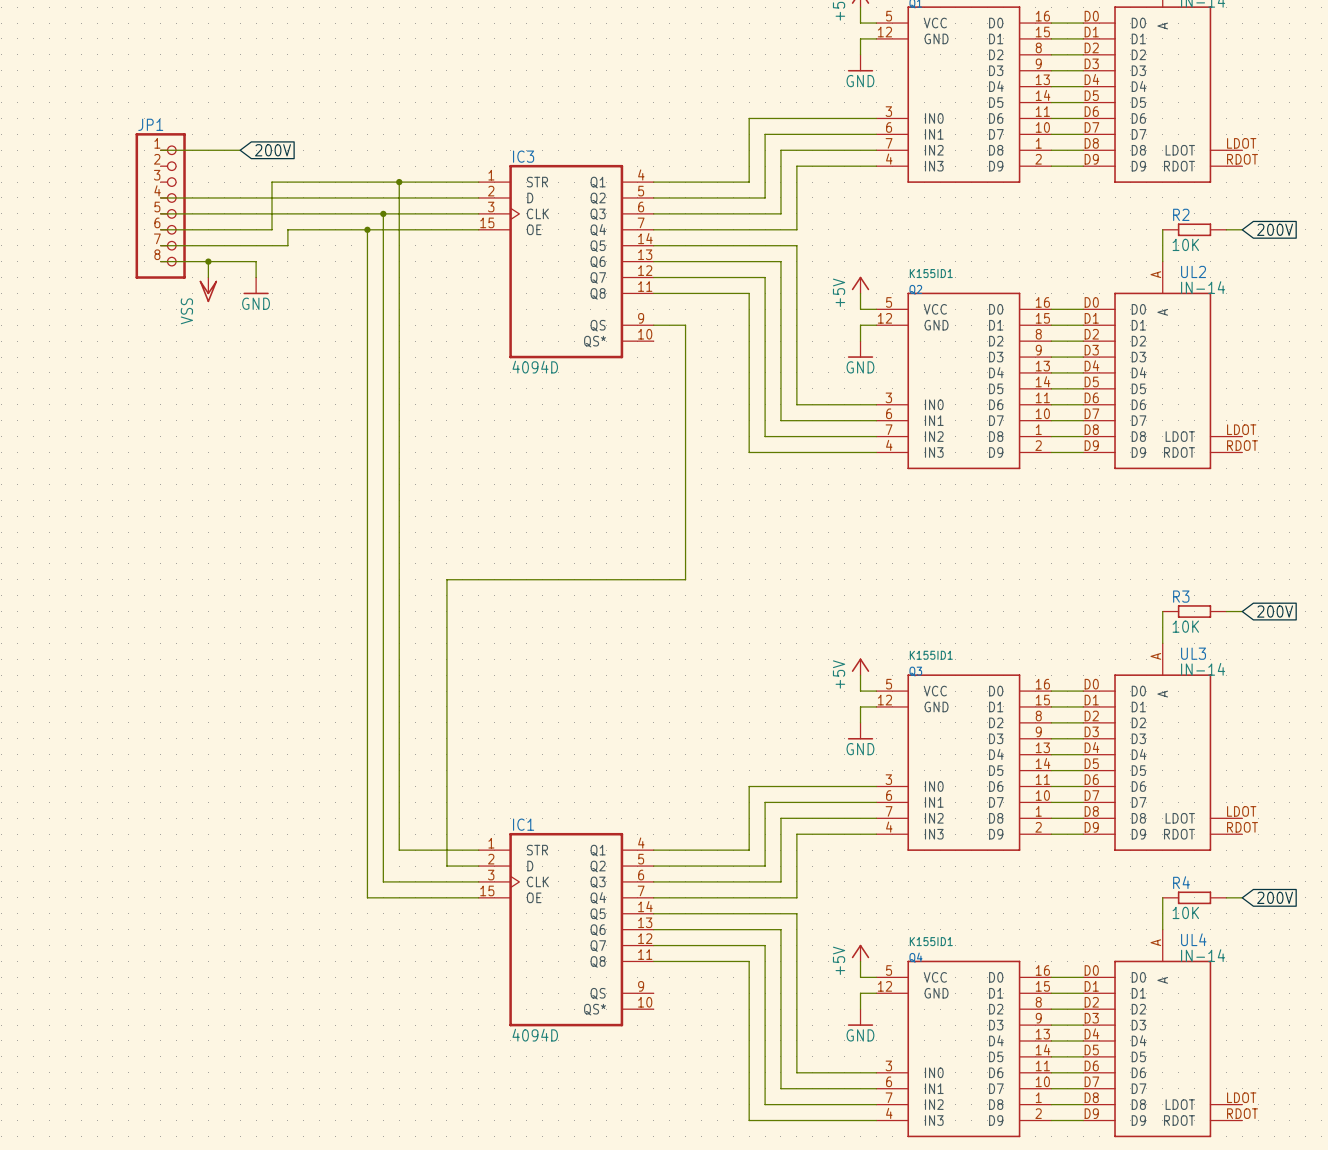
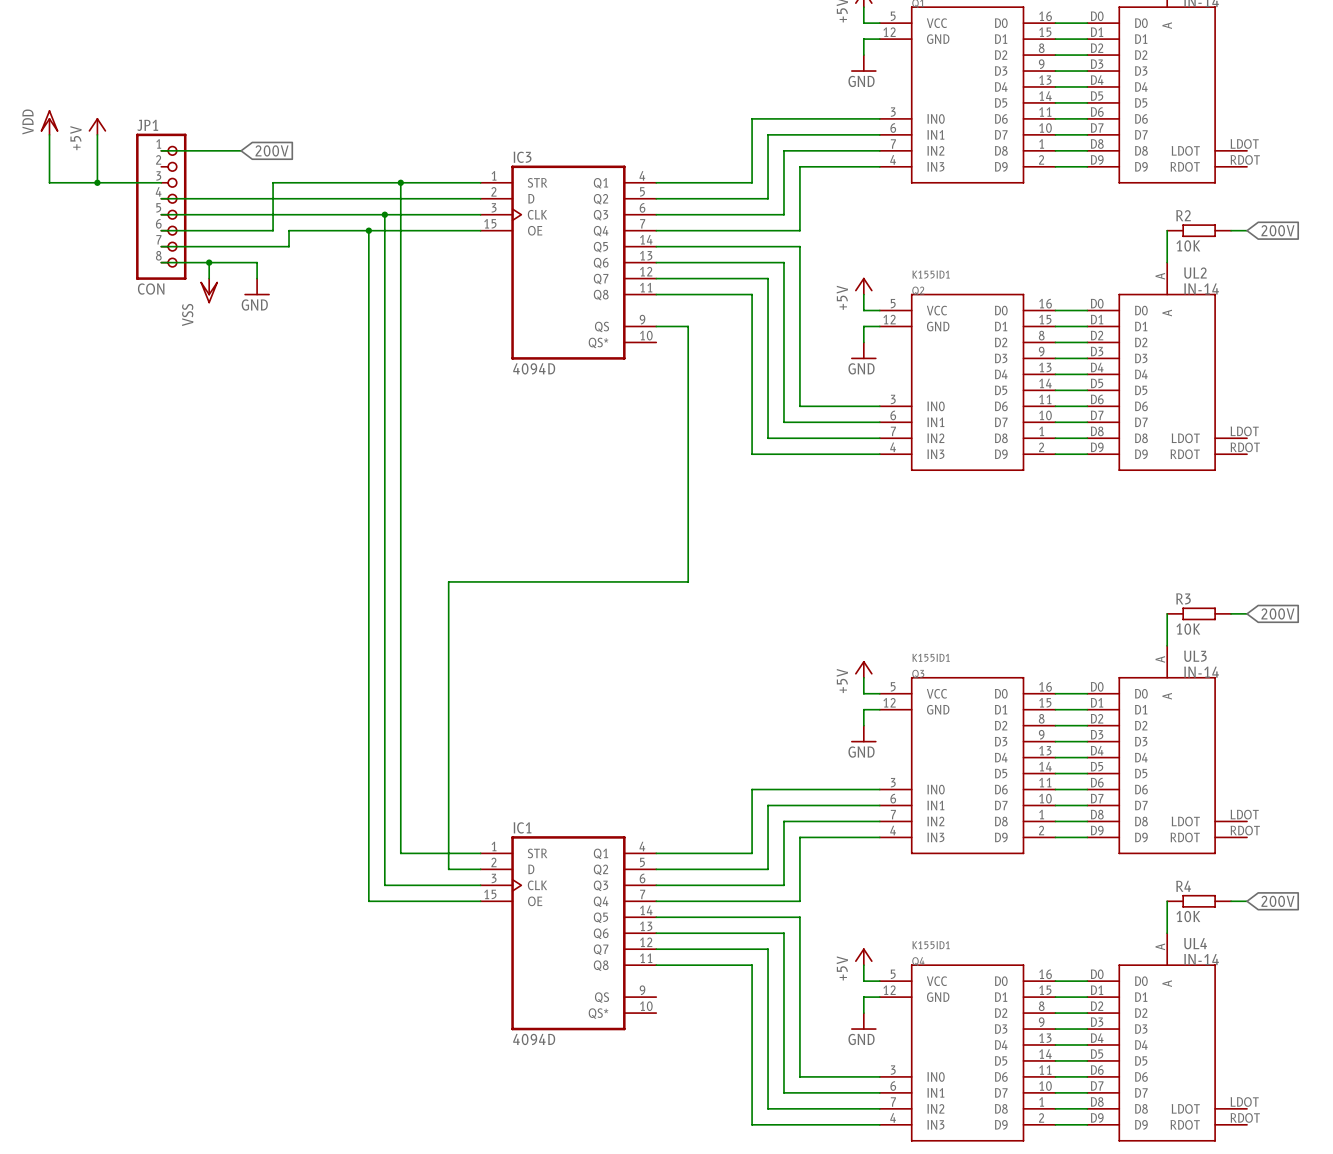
power symbol: none -> VDD (49, 122)
power symbol: none -> +5V (97, 126)
wire: none -> (49, 134) (49, 182) (161, 182)
wire: none -> (97, 134) (97, 182)
junction: none -> (97, 182)
JP1 value: none -> CON (151, 289)

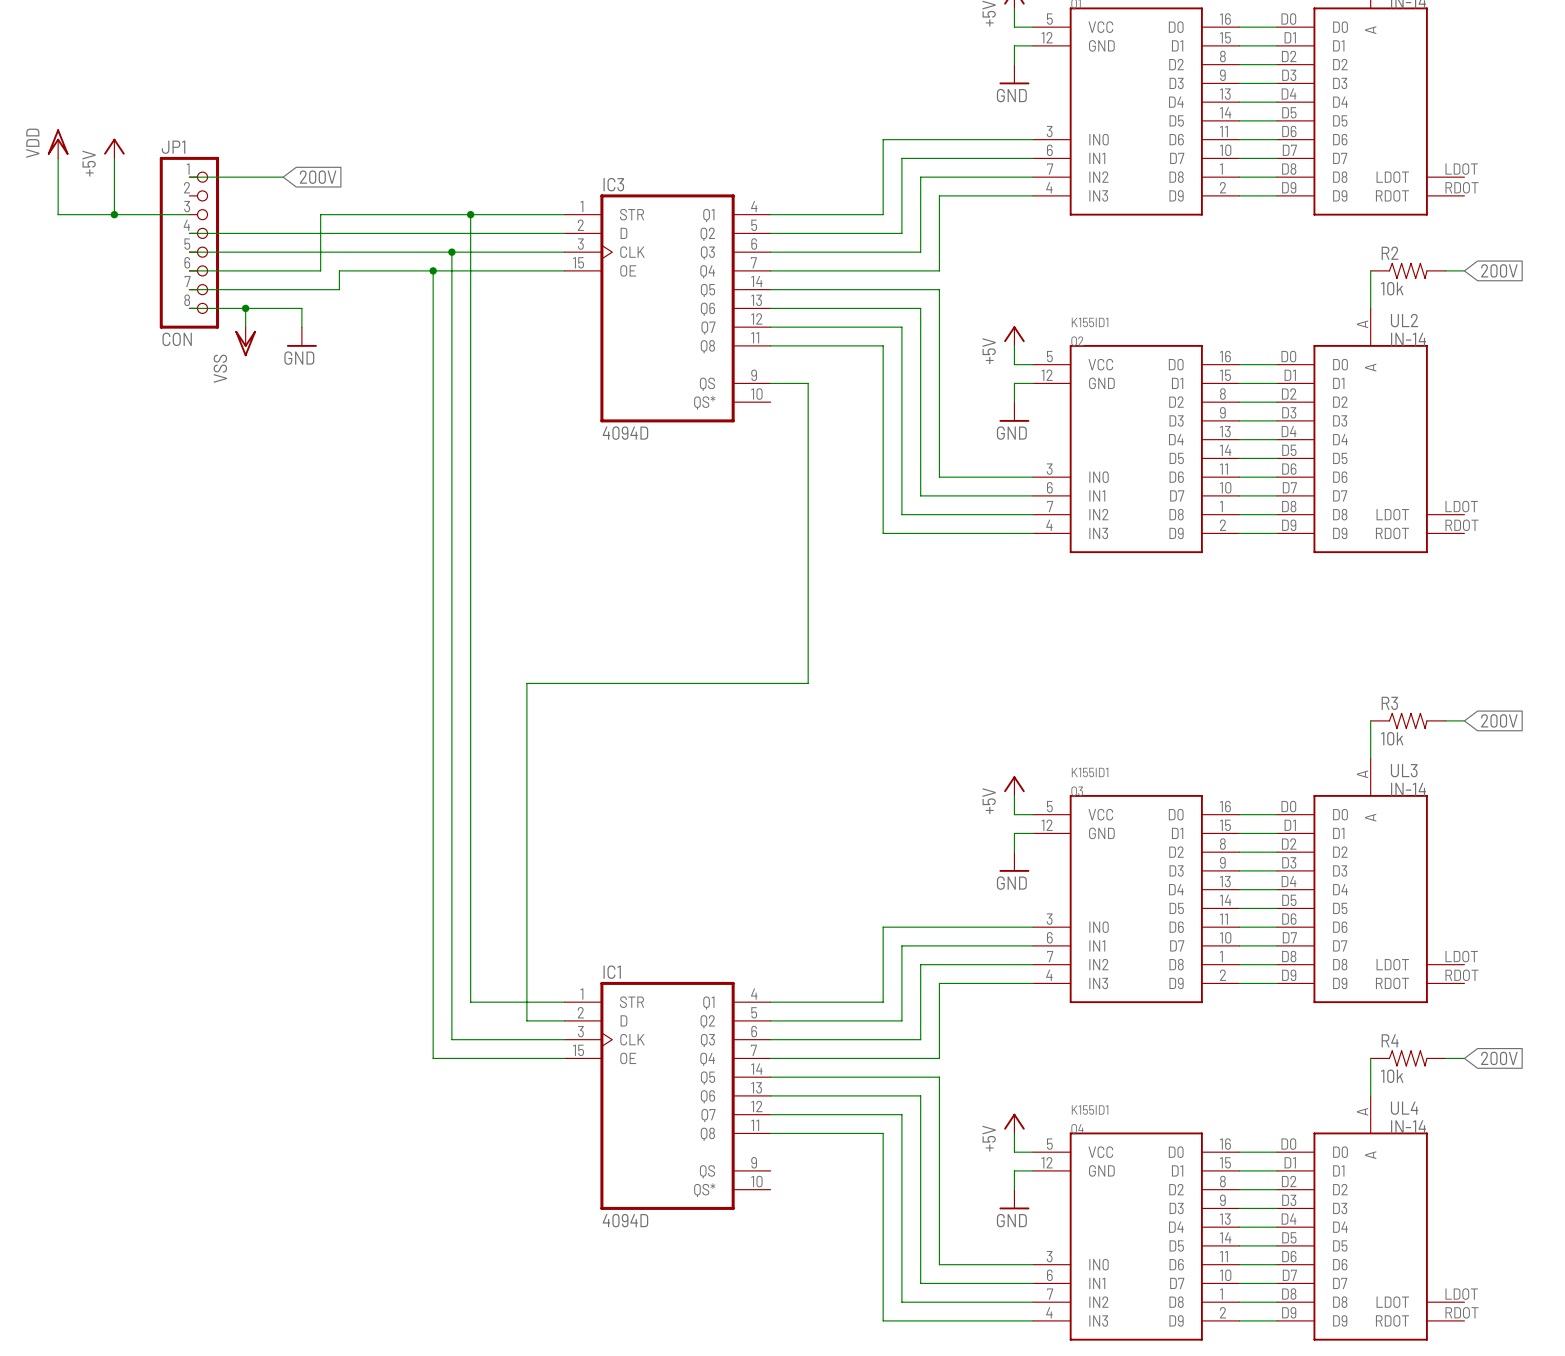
R2 symbol: [1167, 224, 1232, 238] -> [1370, 262, 1446, 279]
R2 value: 10K (1188, 245) -> 10k (1392, 288)
R3 symbol: [1167, 607, 1232, 621] -> [1370, 712, 1446, 729]
R3 value: 10K (1188, 629) -> 10k (1392, 738)
R4 symbol: [1167, 894, 1232, 908] -> [1370, 1050, 1446, 1067]
R4 value: 10K (1188, 916) -> 10k (1392, 1076)

